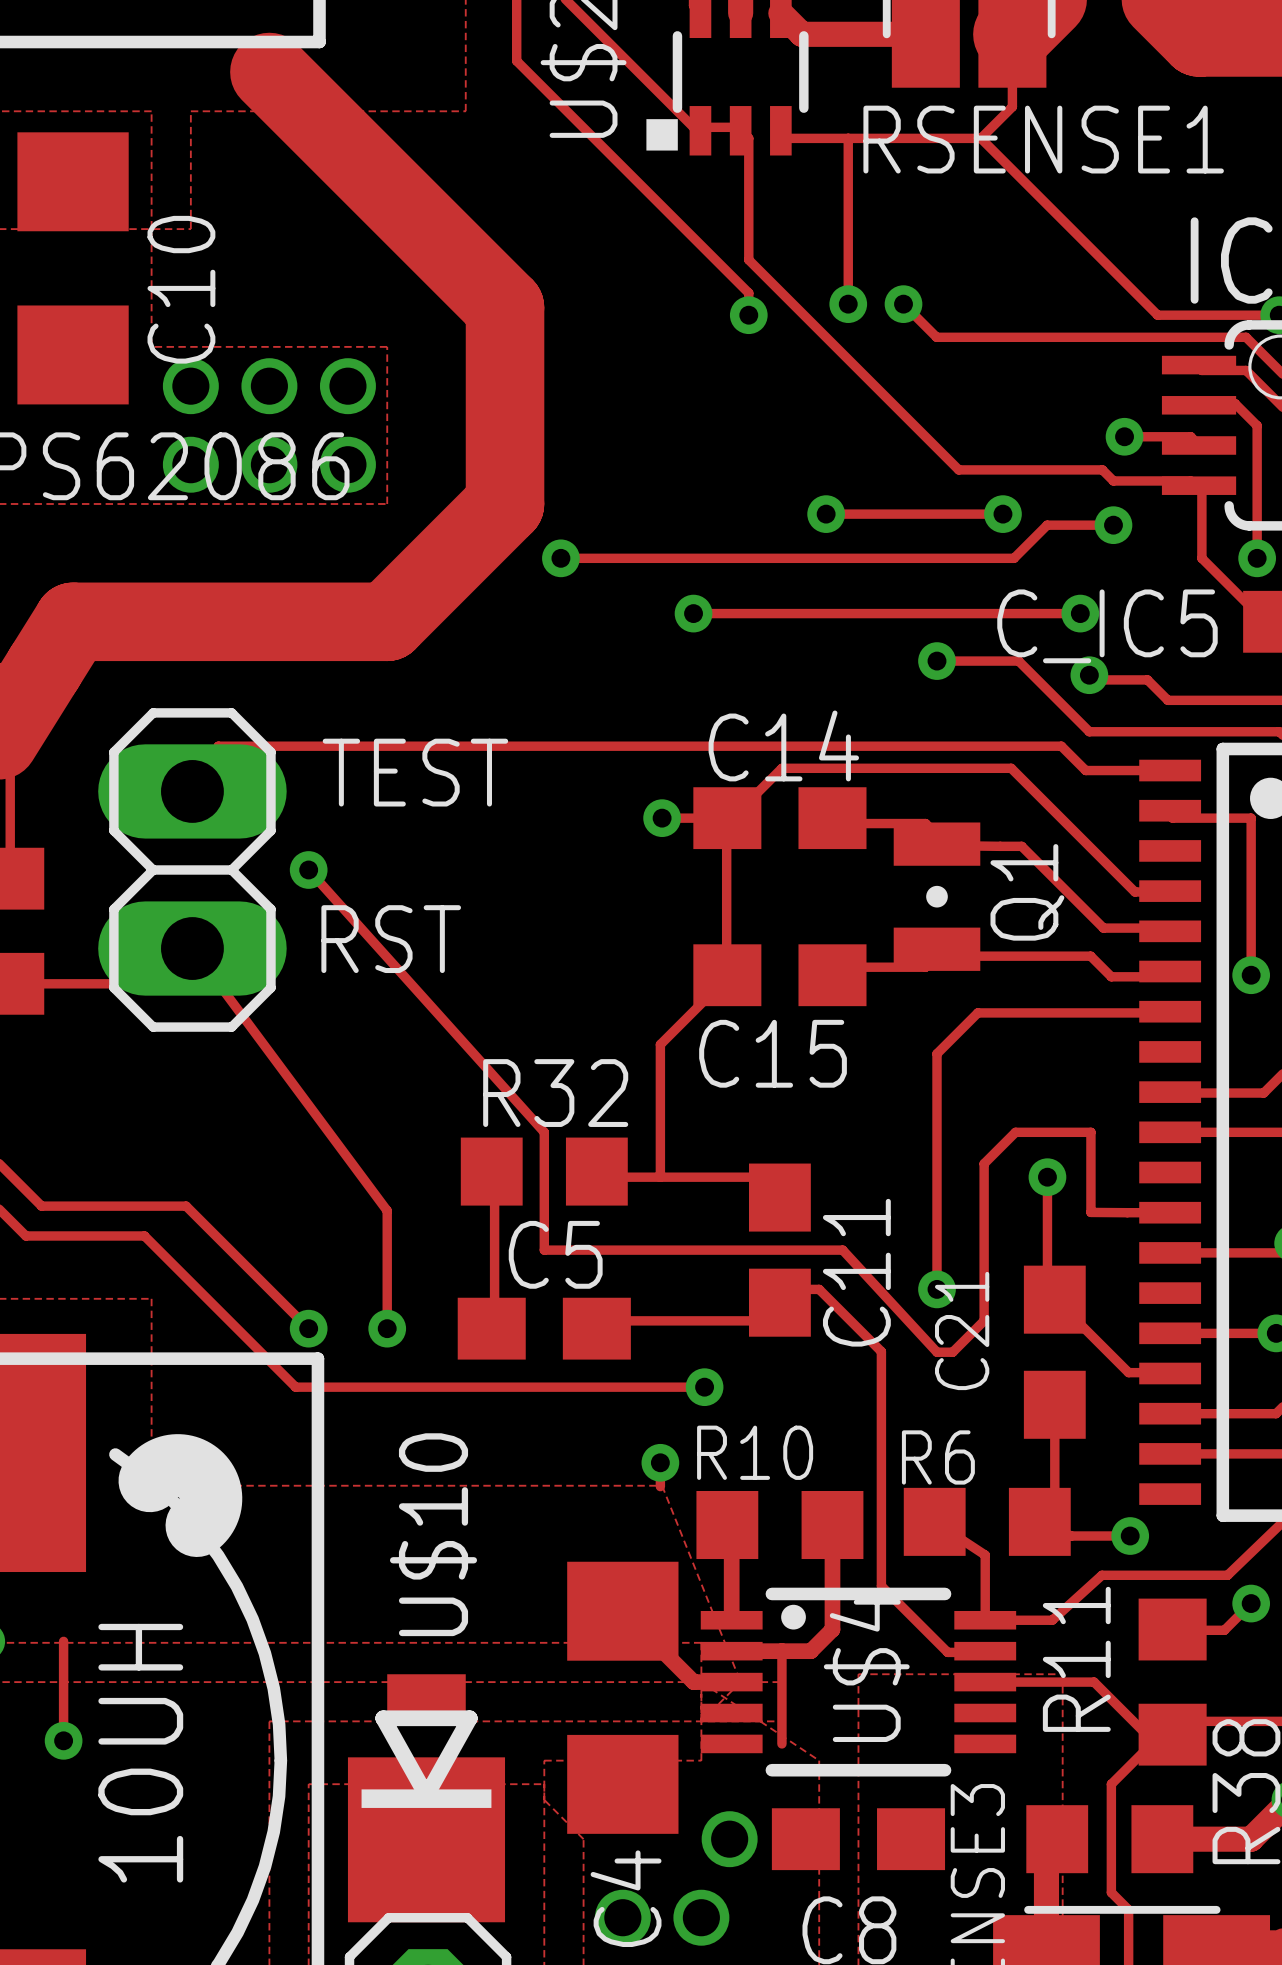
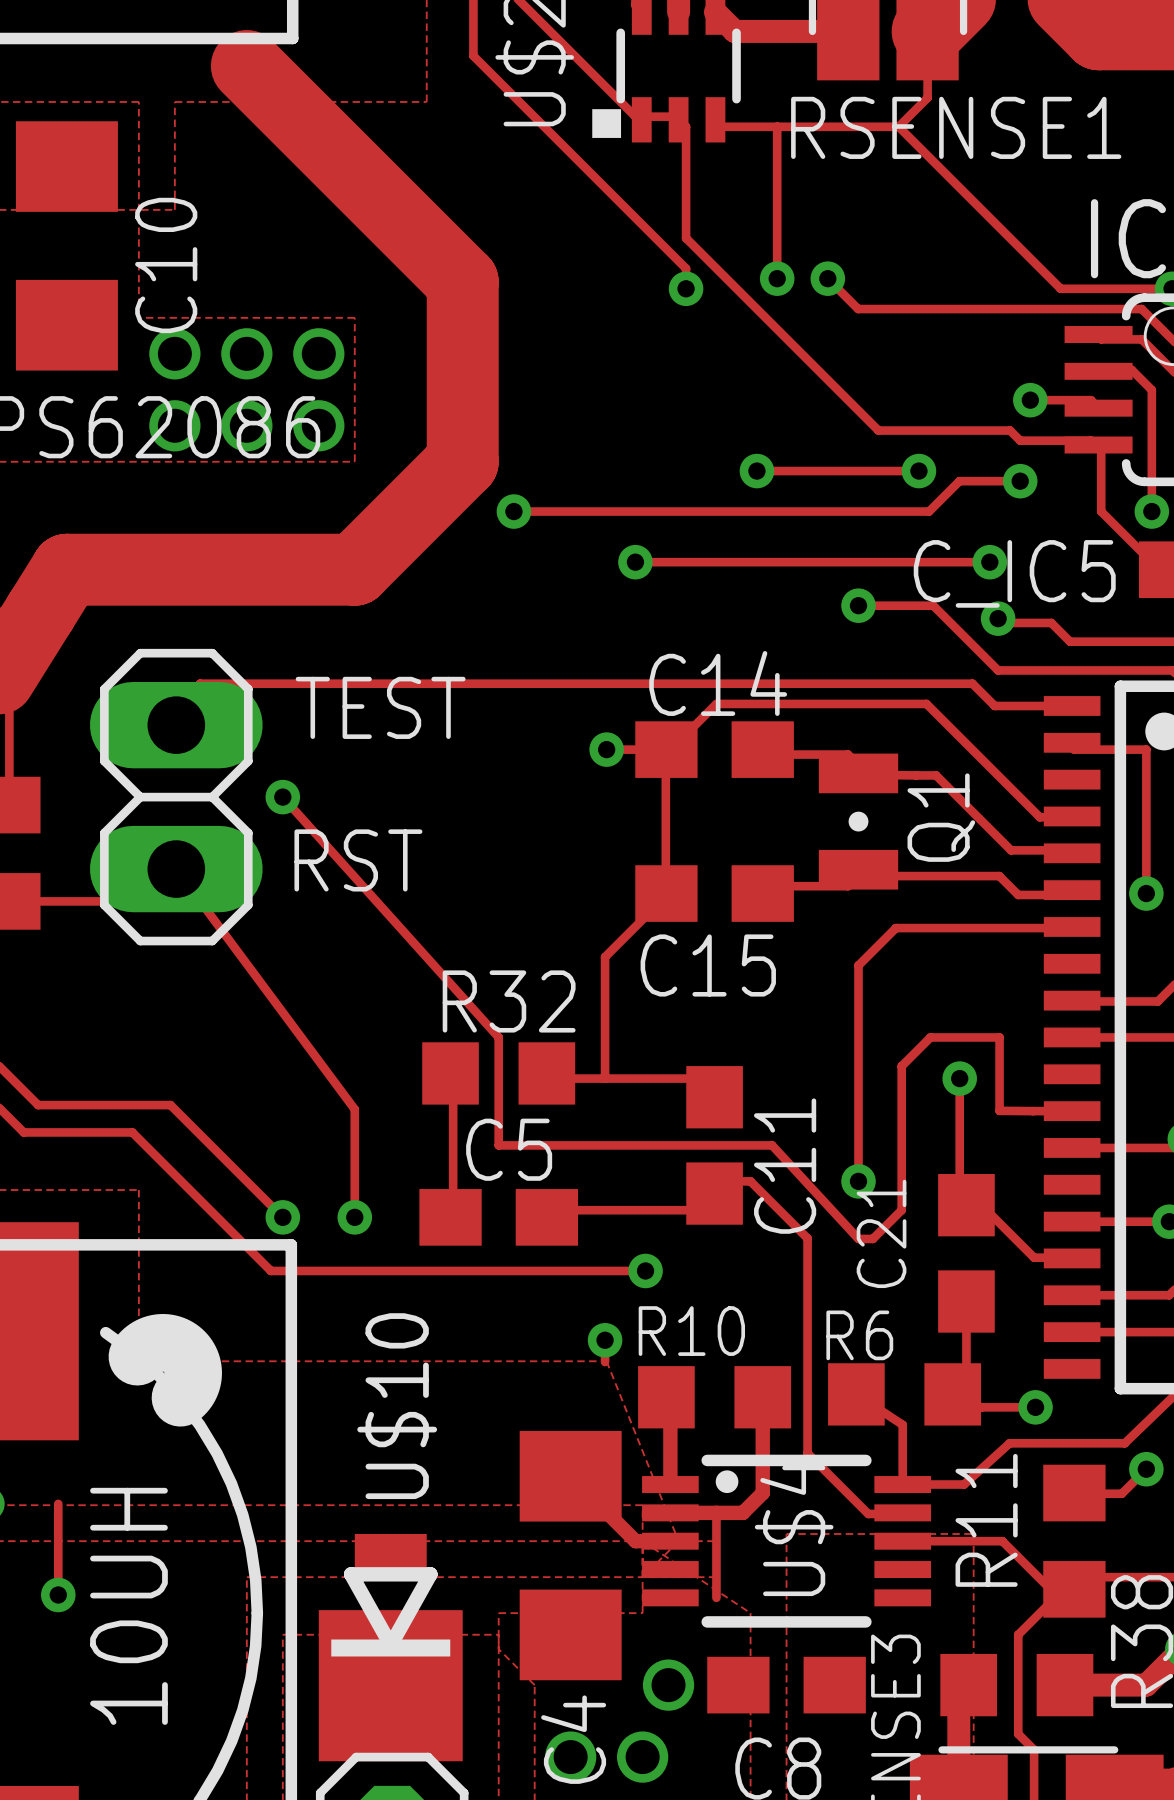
C21 position: (1054, 1352) -> (966, 1253)

